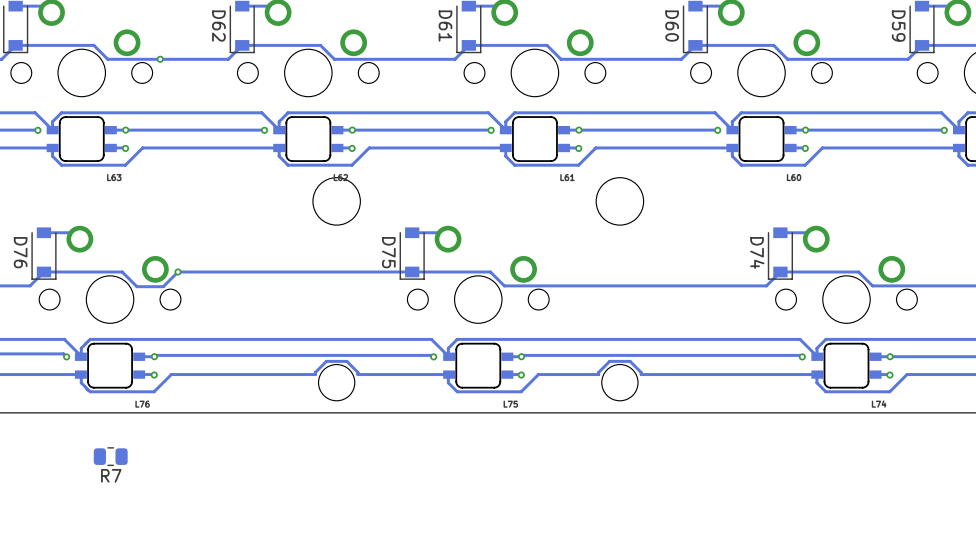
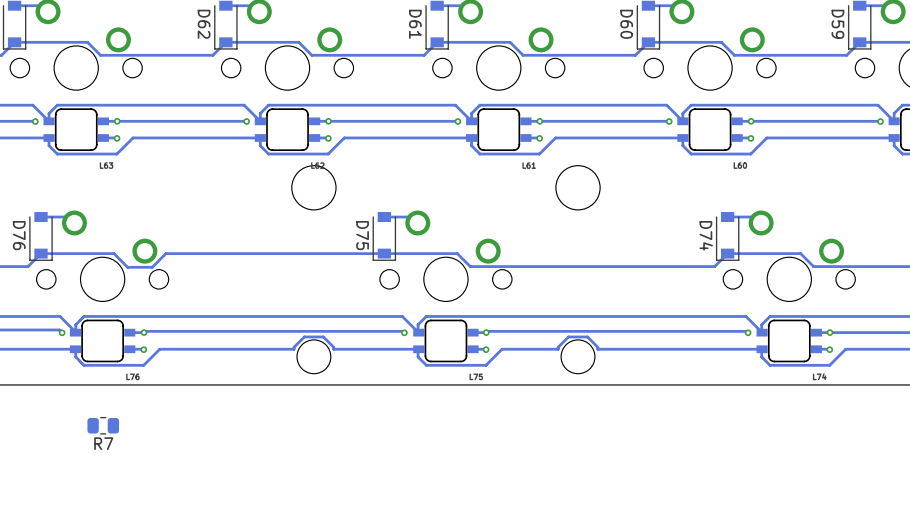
via: (160, 59) -> none
via: (178, 271) -> none

